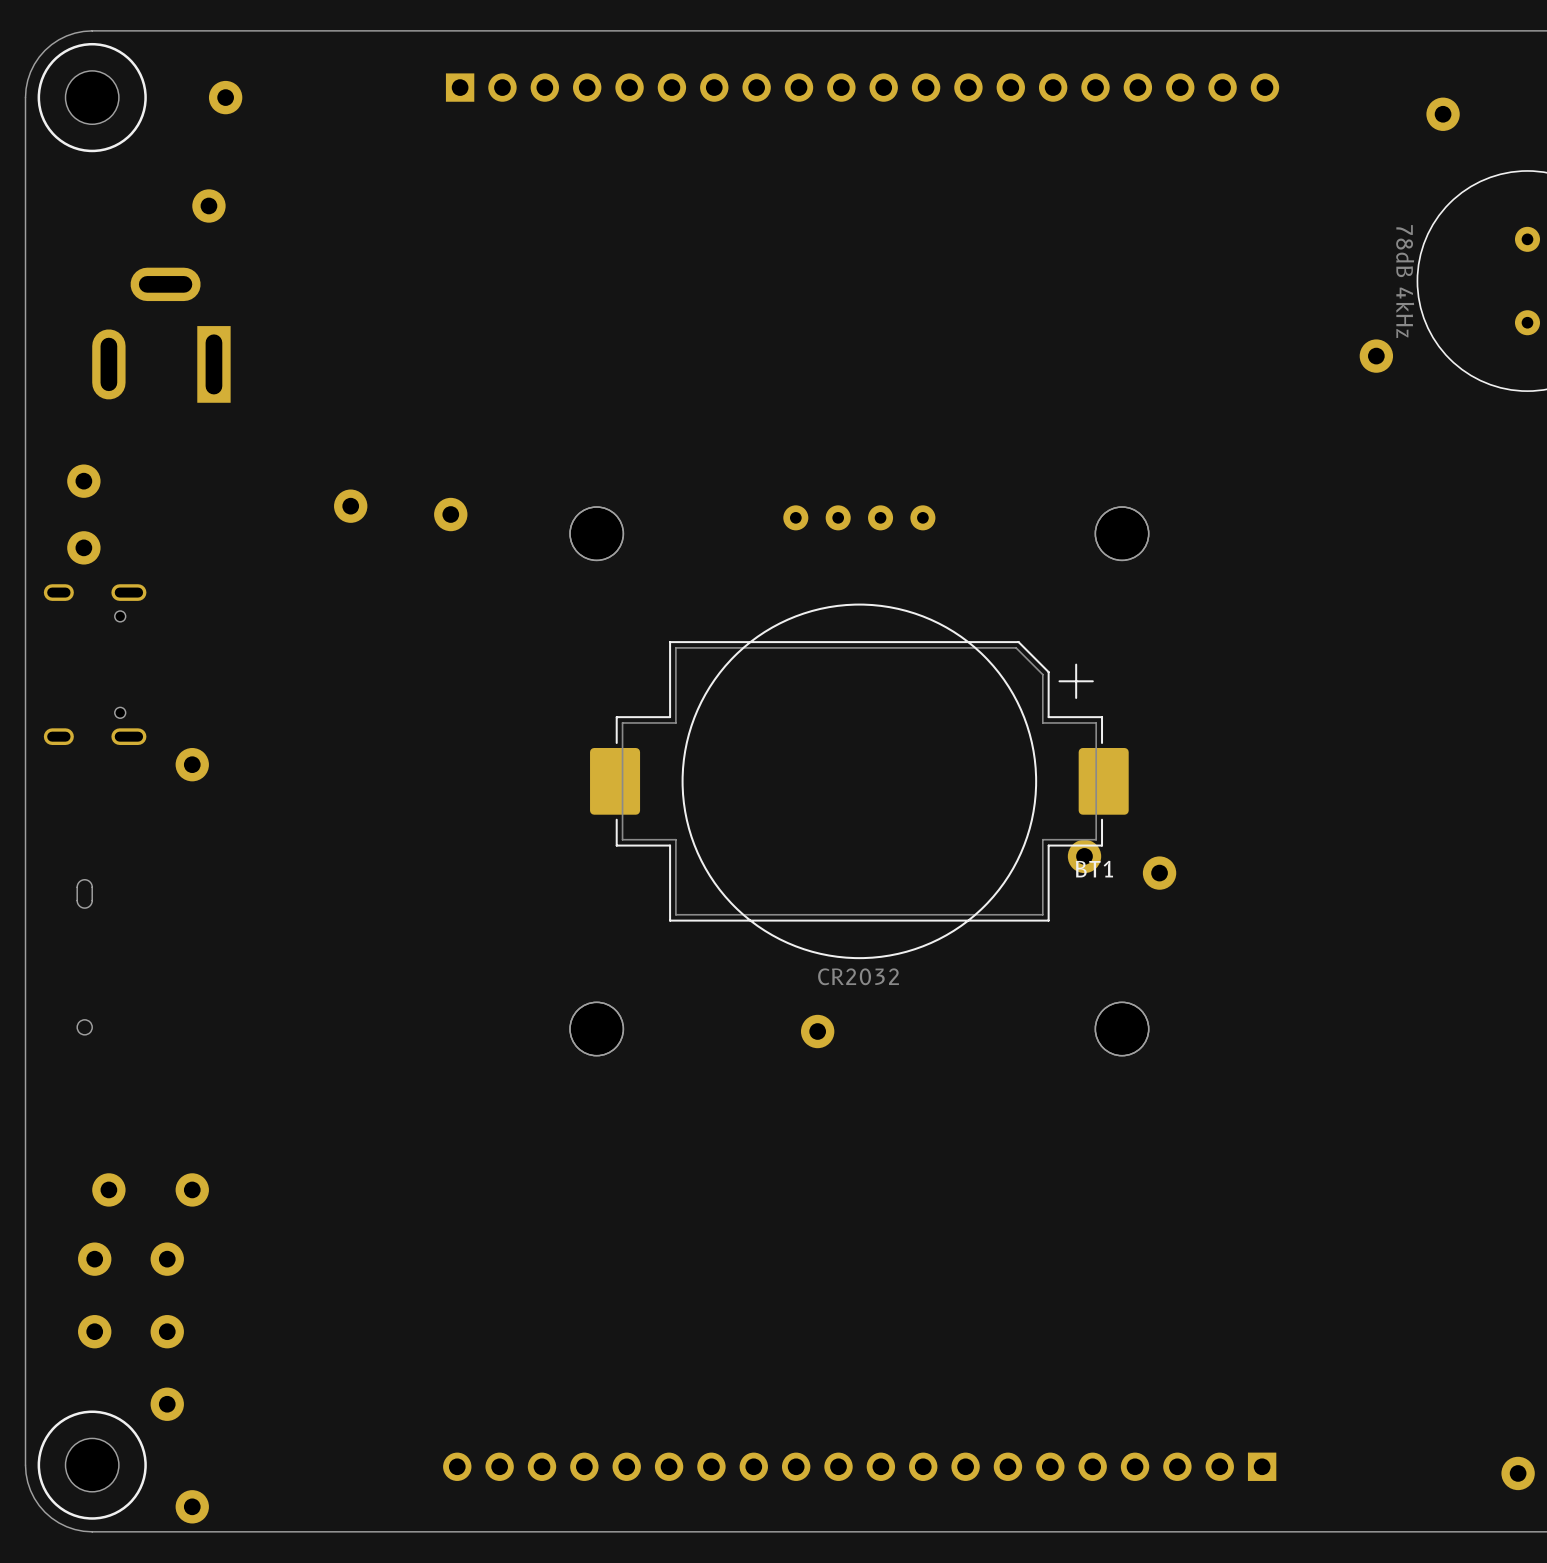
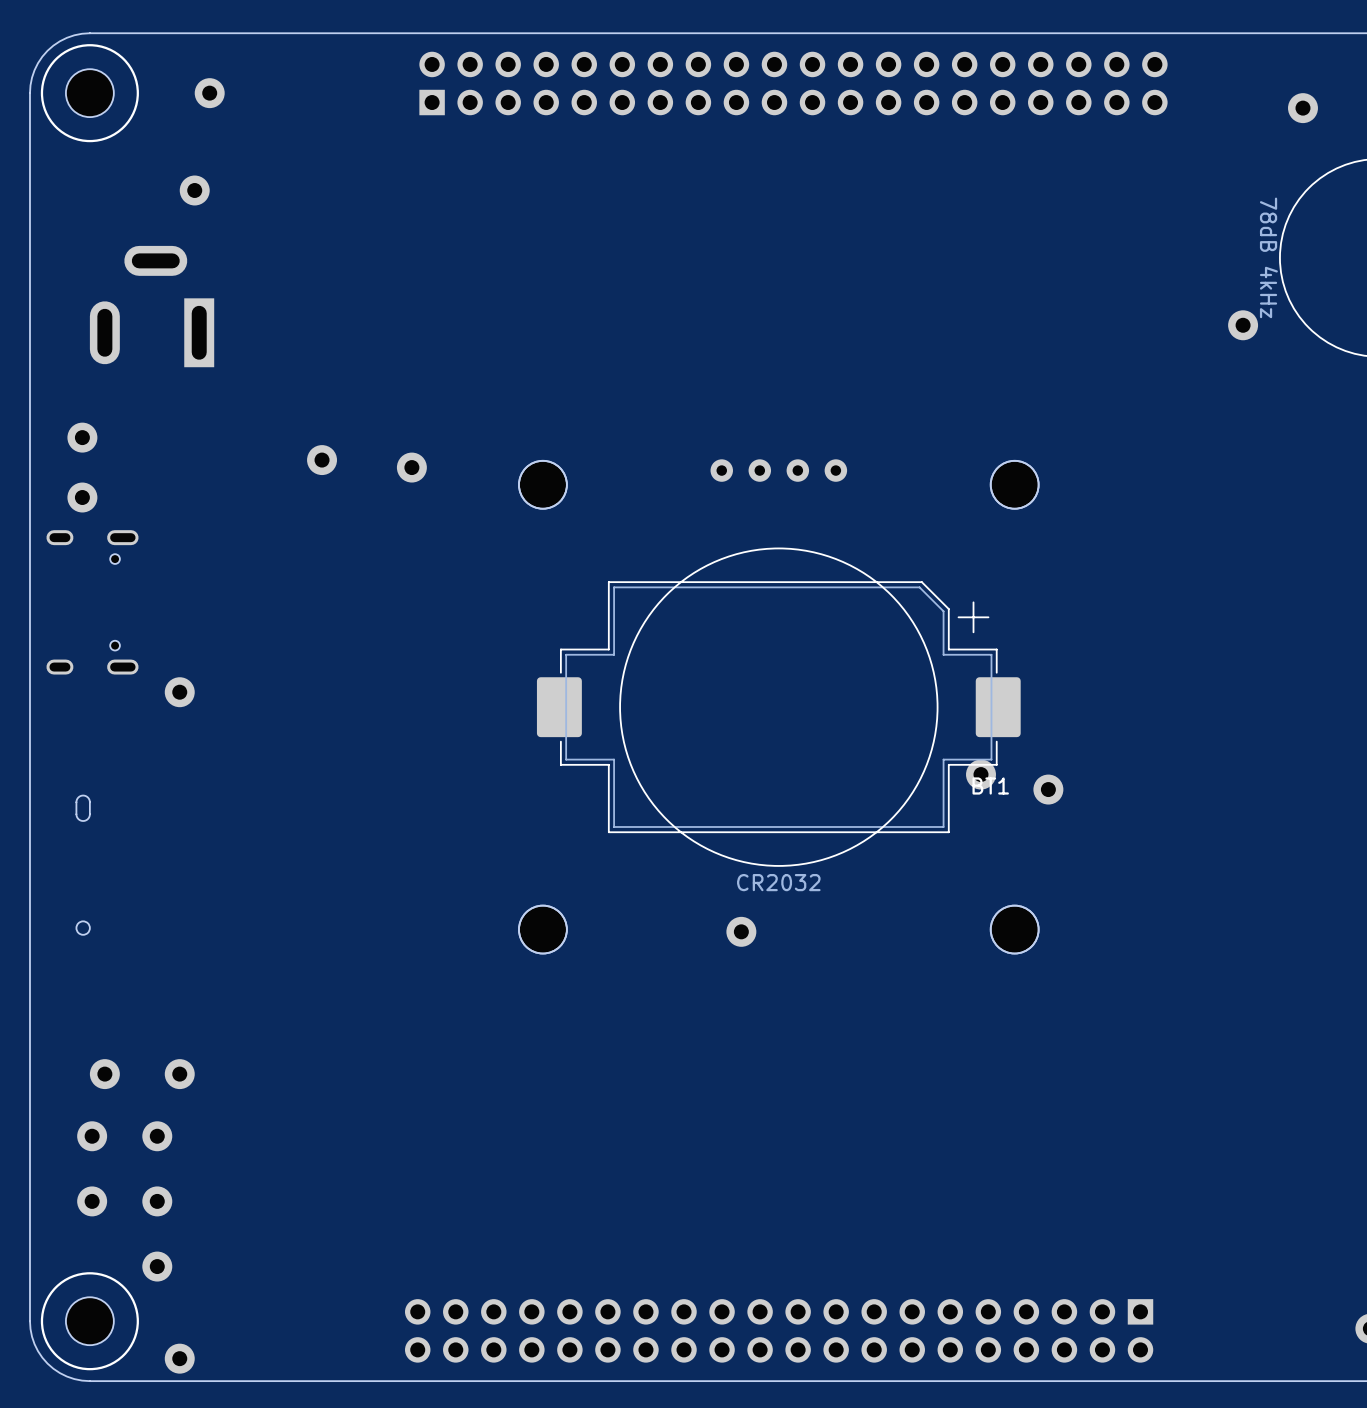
part footprint: [445, 73, 1280, 102] -> [419, 51, 1168, 116]
part footprint: [443, 1452, 1277, 1481] -> [405, 1299, 1154, 1363]

